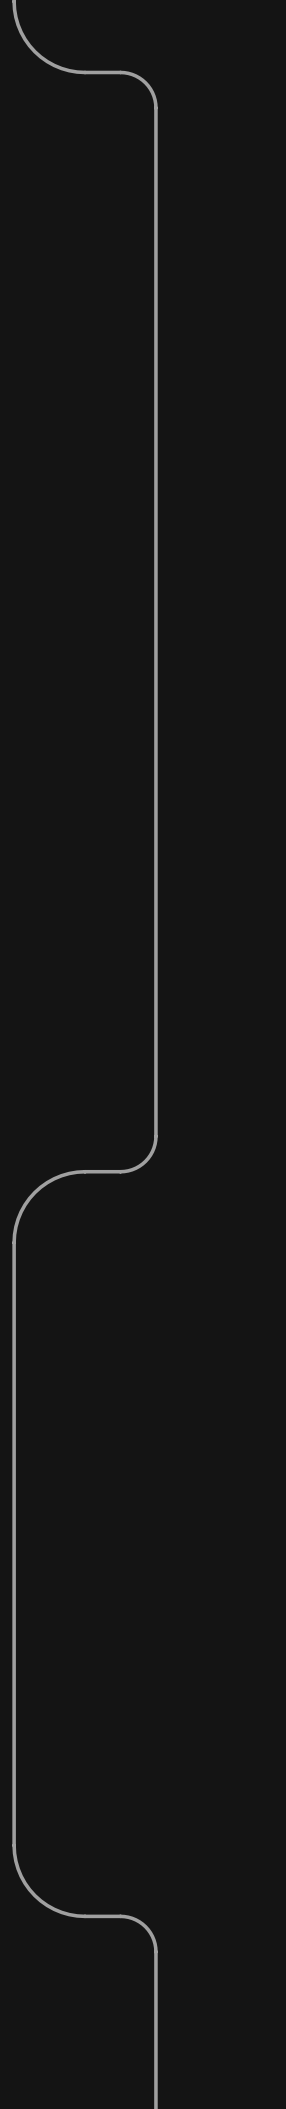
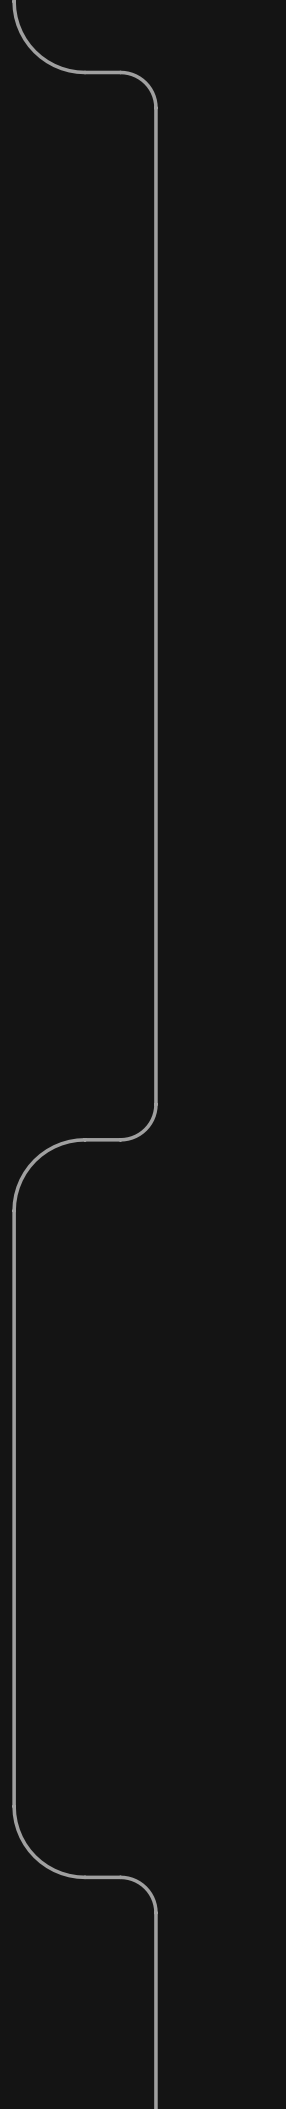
board edge: (155, 1104) (155, 1144) (145, 1161) (128, 1170) (77, 1172) (61, 1175) (47, 1182) (34, 1192) (24, 1204) (18, 1219) (14, 1242) -> (155, 1104) (150, 1123) (135, 1136) (124, 1139) (69, 1141) (47, 1150) (34, 1160) (21, 1179) (15, 1194) (14, 1242)
board edge: (14, 1806) (15, 1861) (24, 1883) (34, 1895) (54, 1909) (69, 1914) (124, 1916) (135, 1919) (150, 1932) (155, 1951) -> (14, 1806) (18, 1829) (24, 1844) (34, 1856) (47, 1866) (61, 1873) (77, 1876) (128, 1878) (145, 1887) (152, 1897) (155, 1908) (155, 1951)

